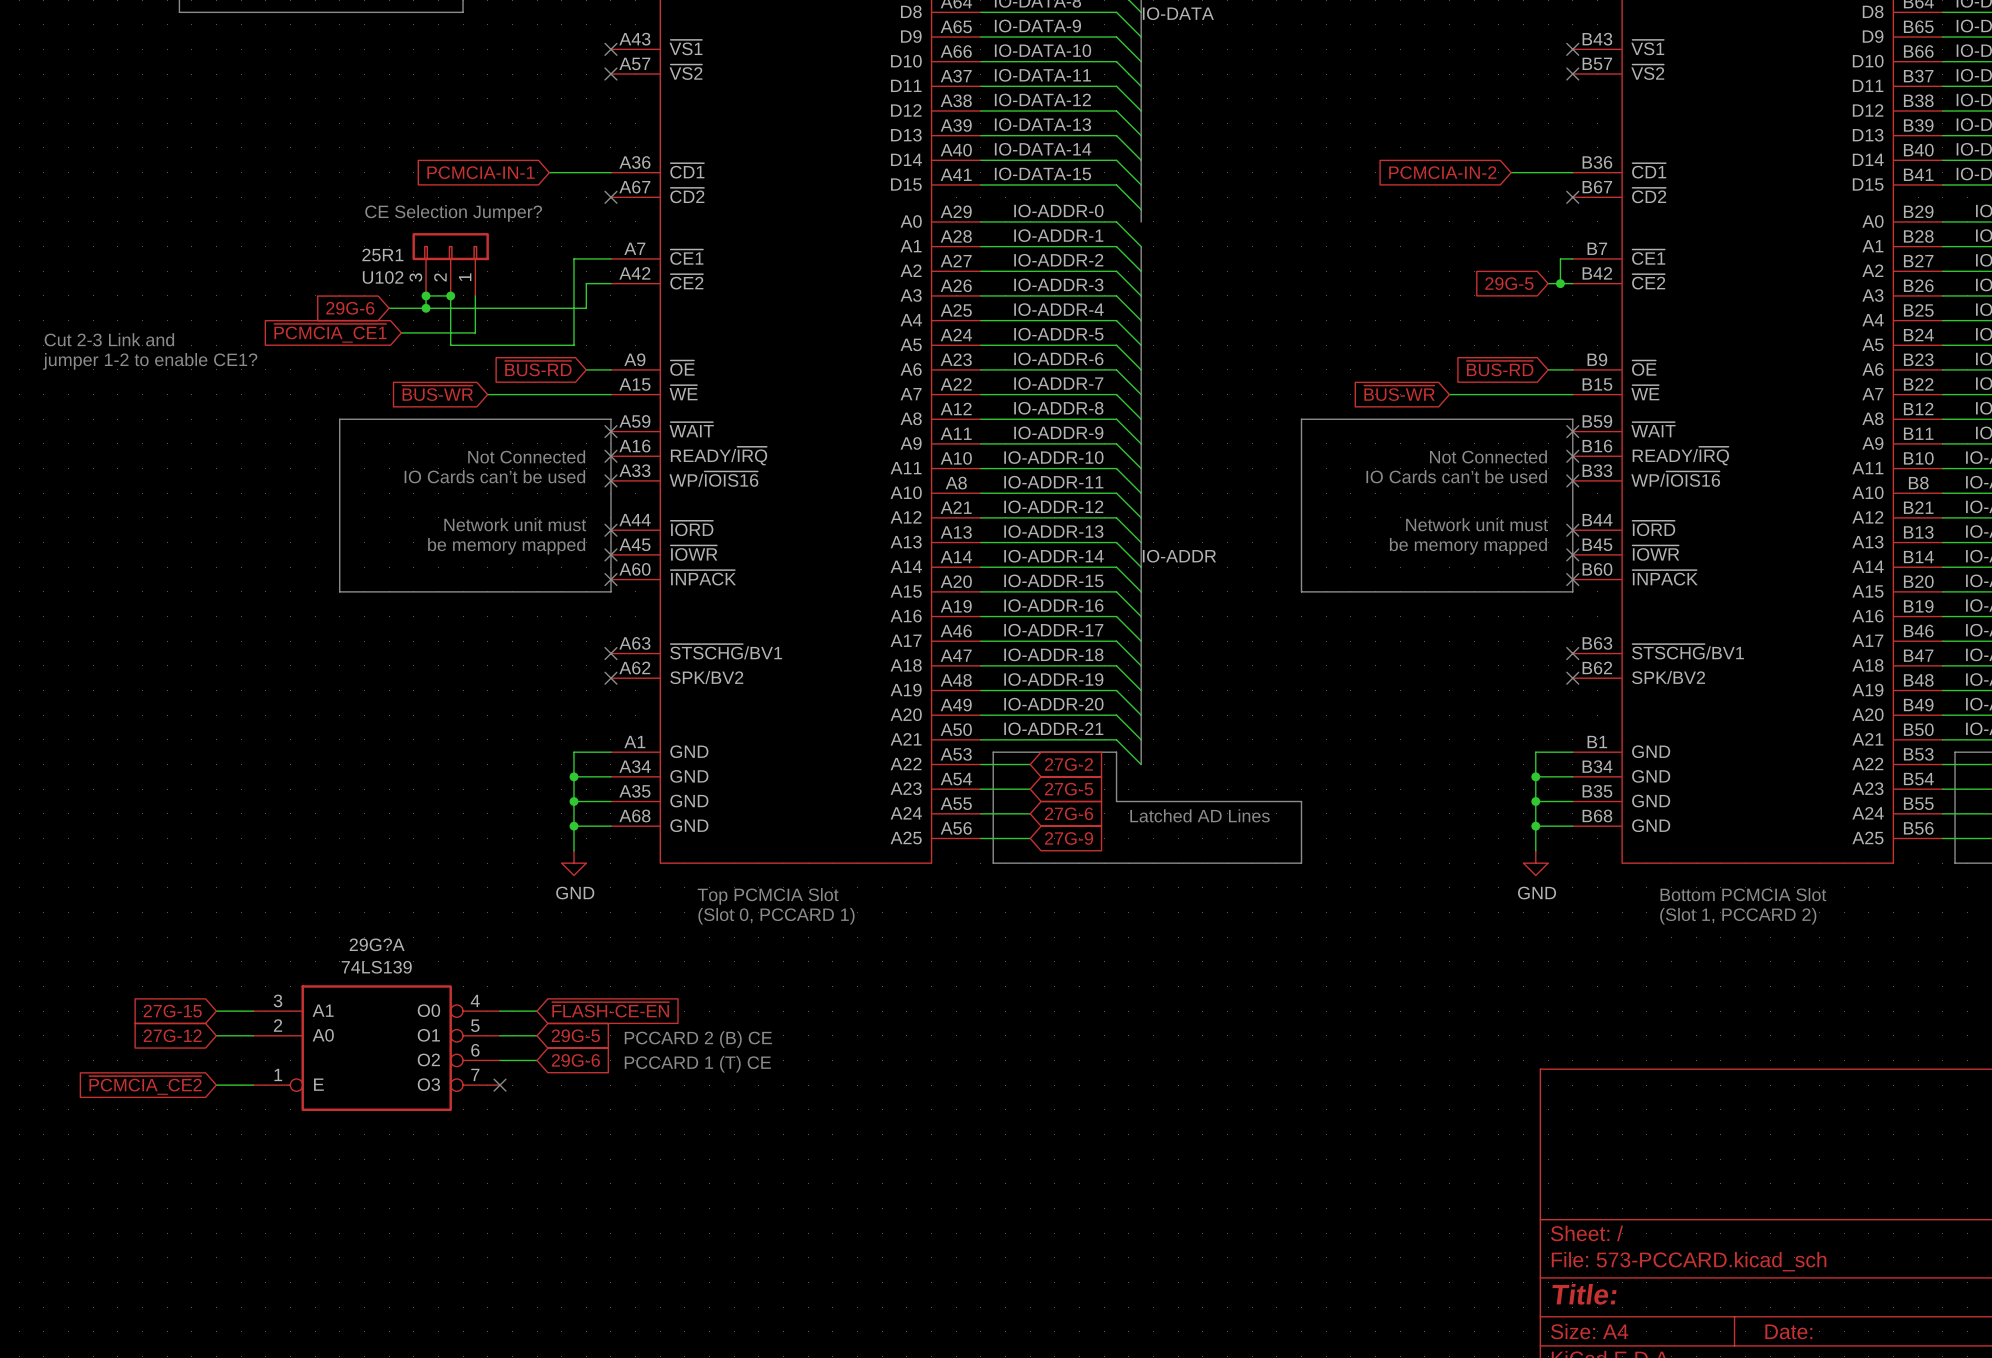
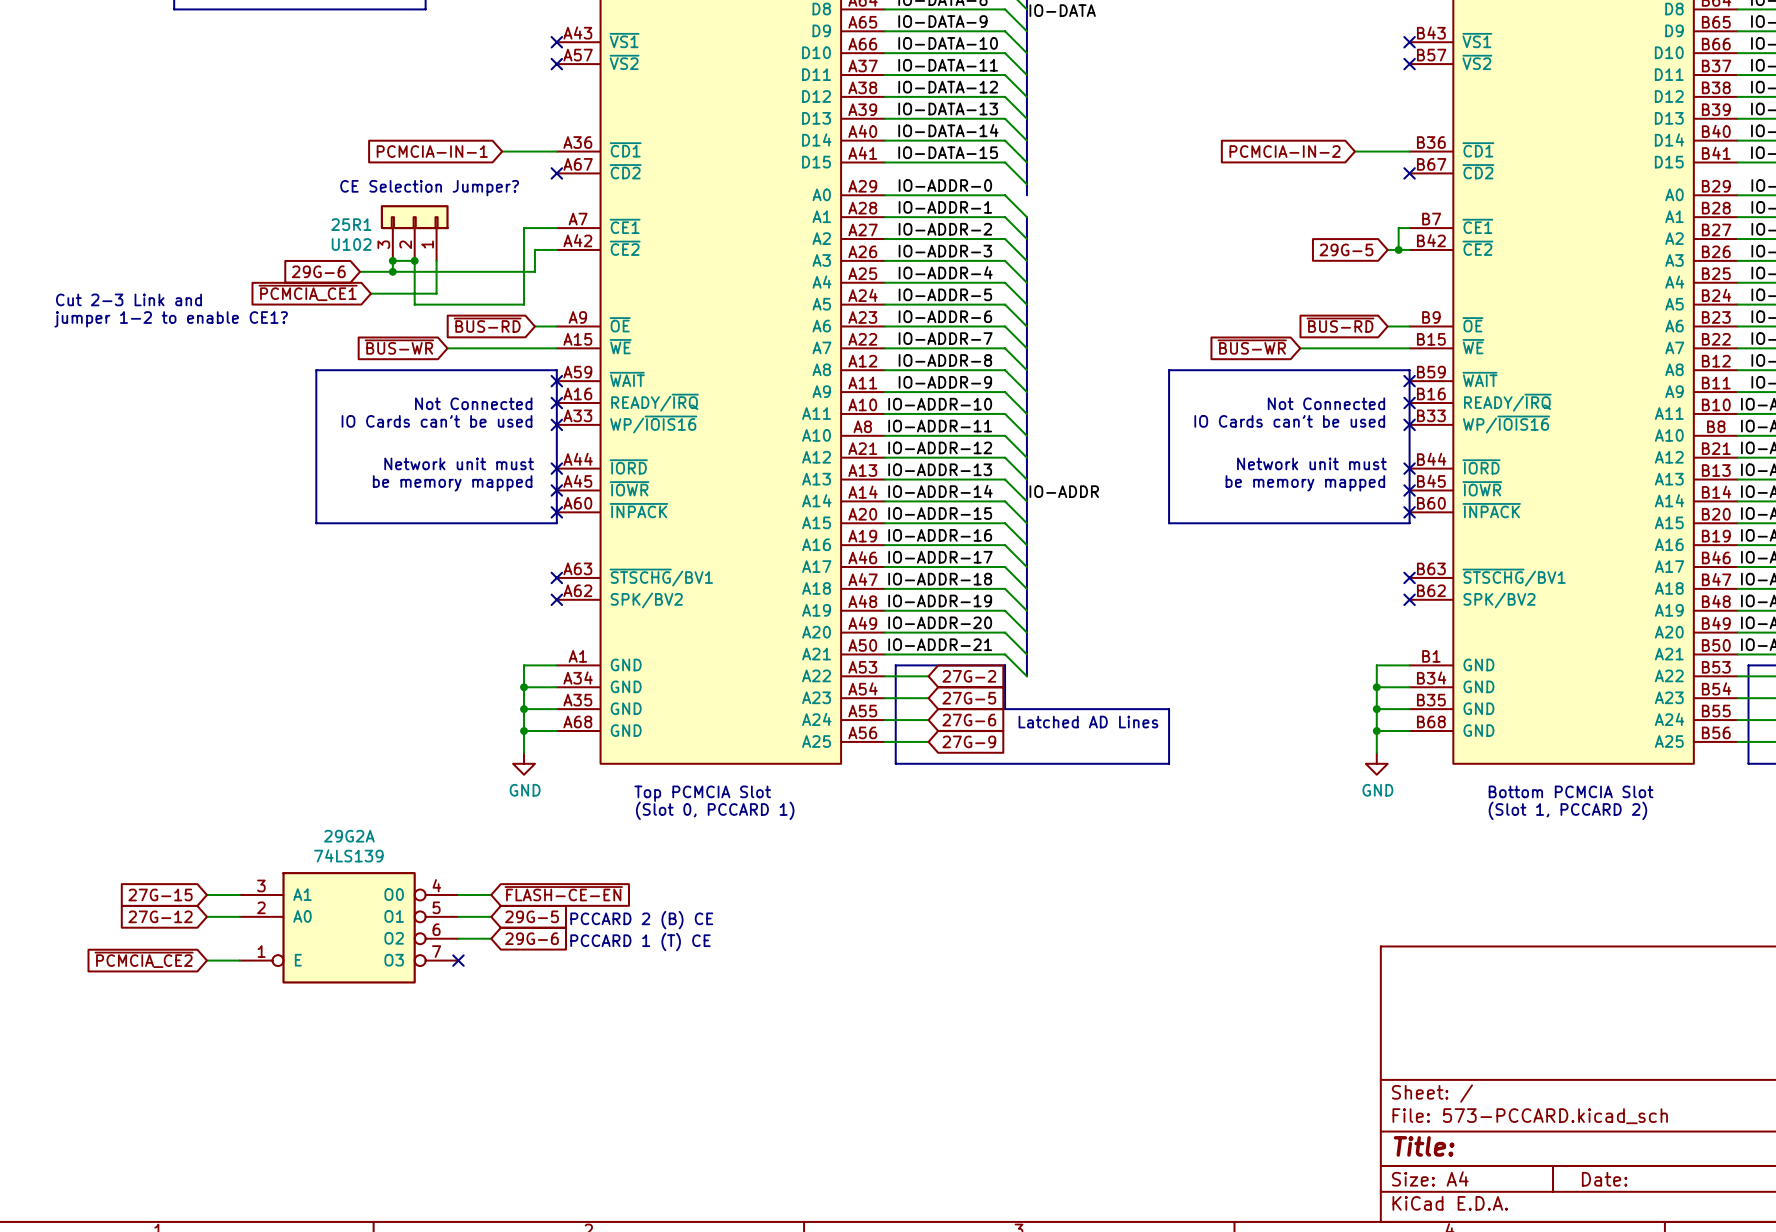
29G?A name: 29G?A (377, 944) -> 29G2A (349, 836)

